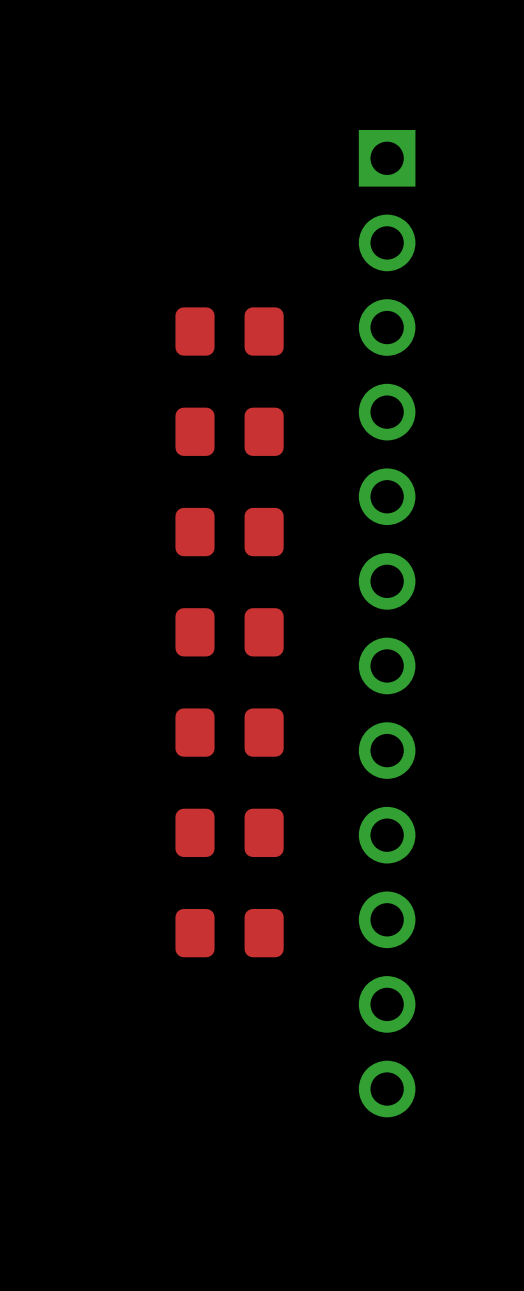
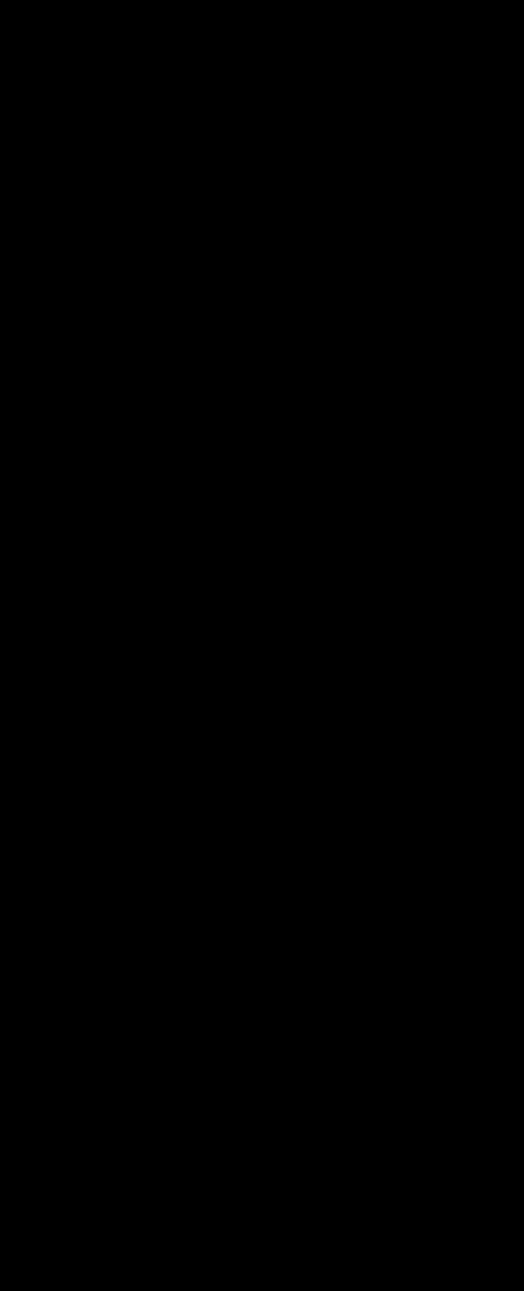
part: (229, 331) -> none
part: (229, 431) -> none
part: (229, 532) -> none
part: (387, 623) -> none
part: (229, 632) -> none
part: (229, 732) -> none
part: (229, 832) -> none
part: (229, 933) -> none

